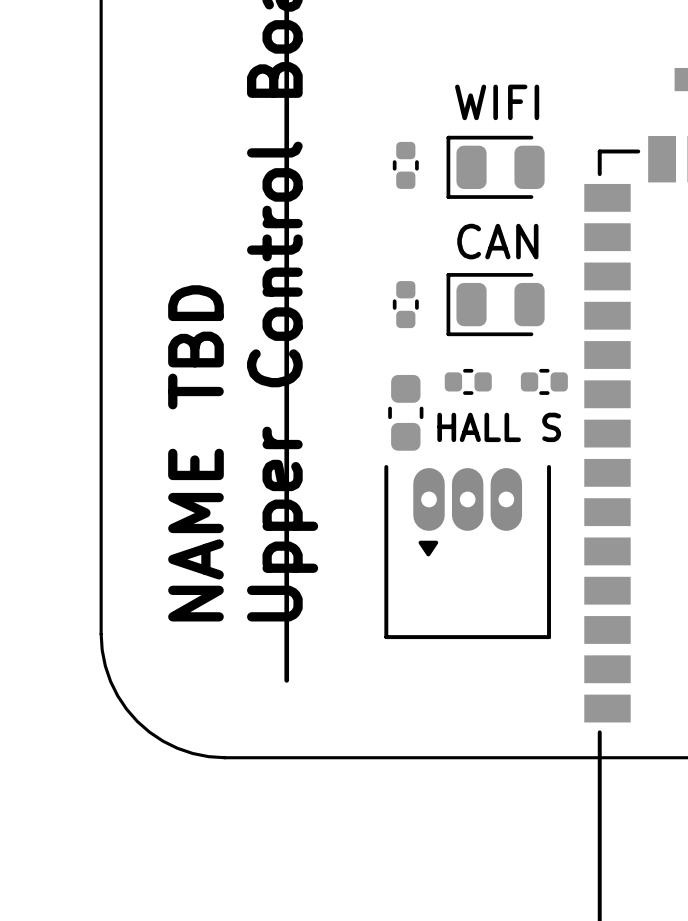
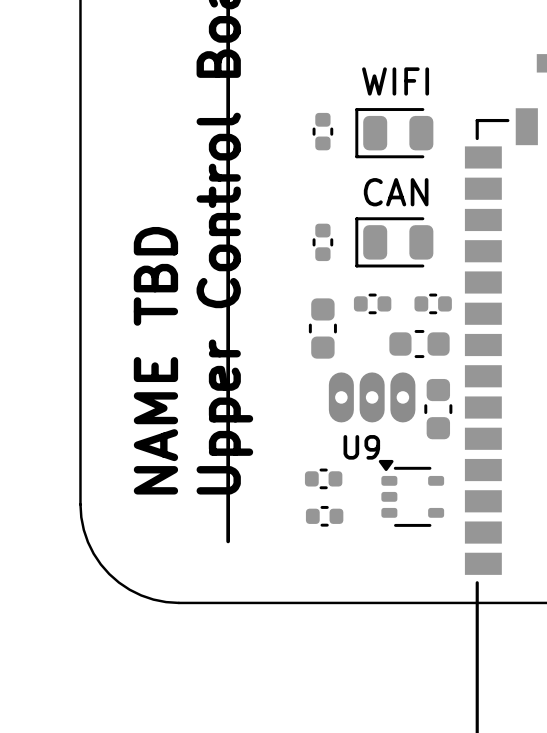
part: none -> (419, 344)
part: none -> (438, 409)
HALL S side: top (467, 552) -> bottom (372, 397)
part: none -> (323, 478)
U9: none -> (411, 493)
part: none -> (324, 516)

